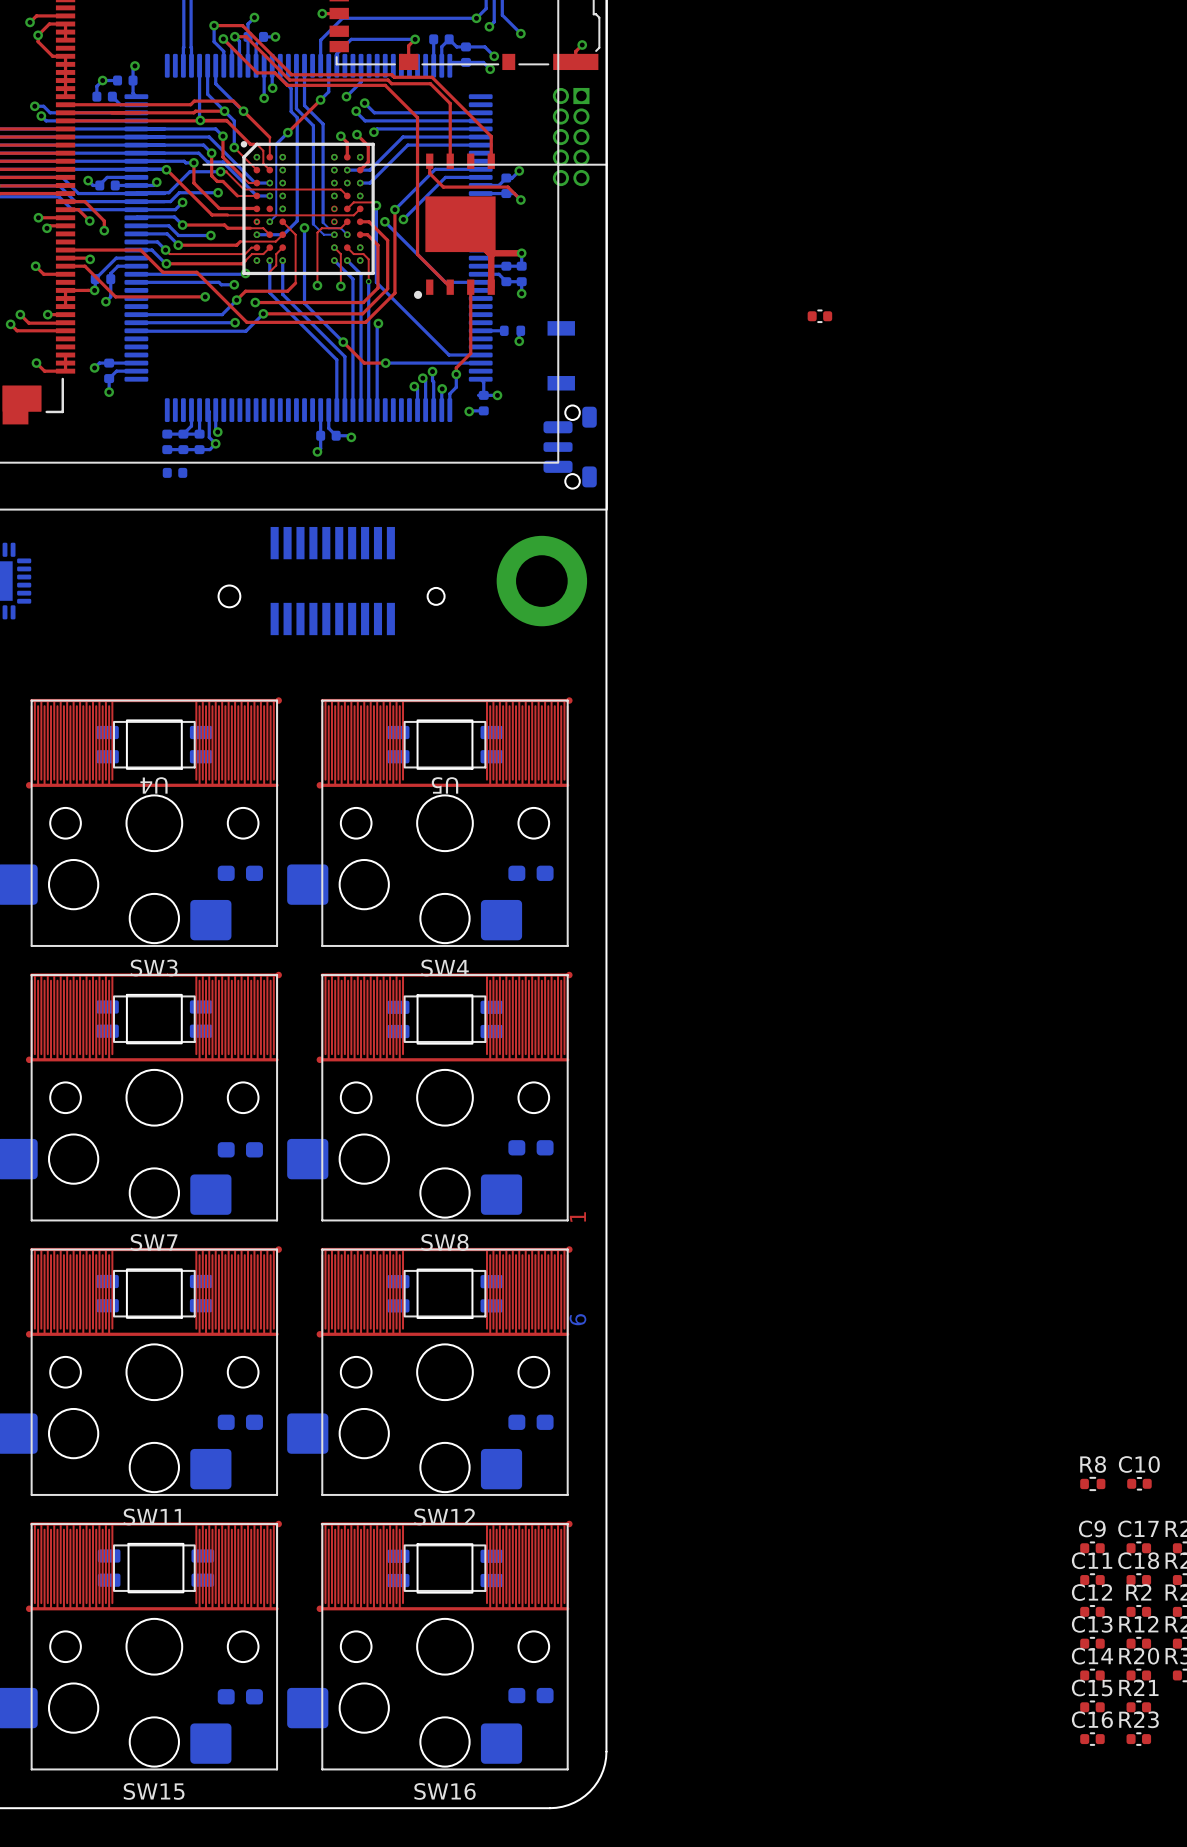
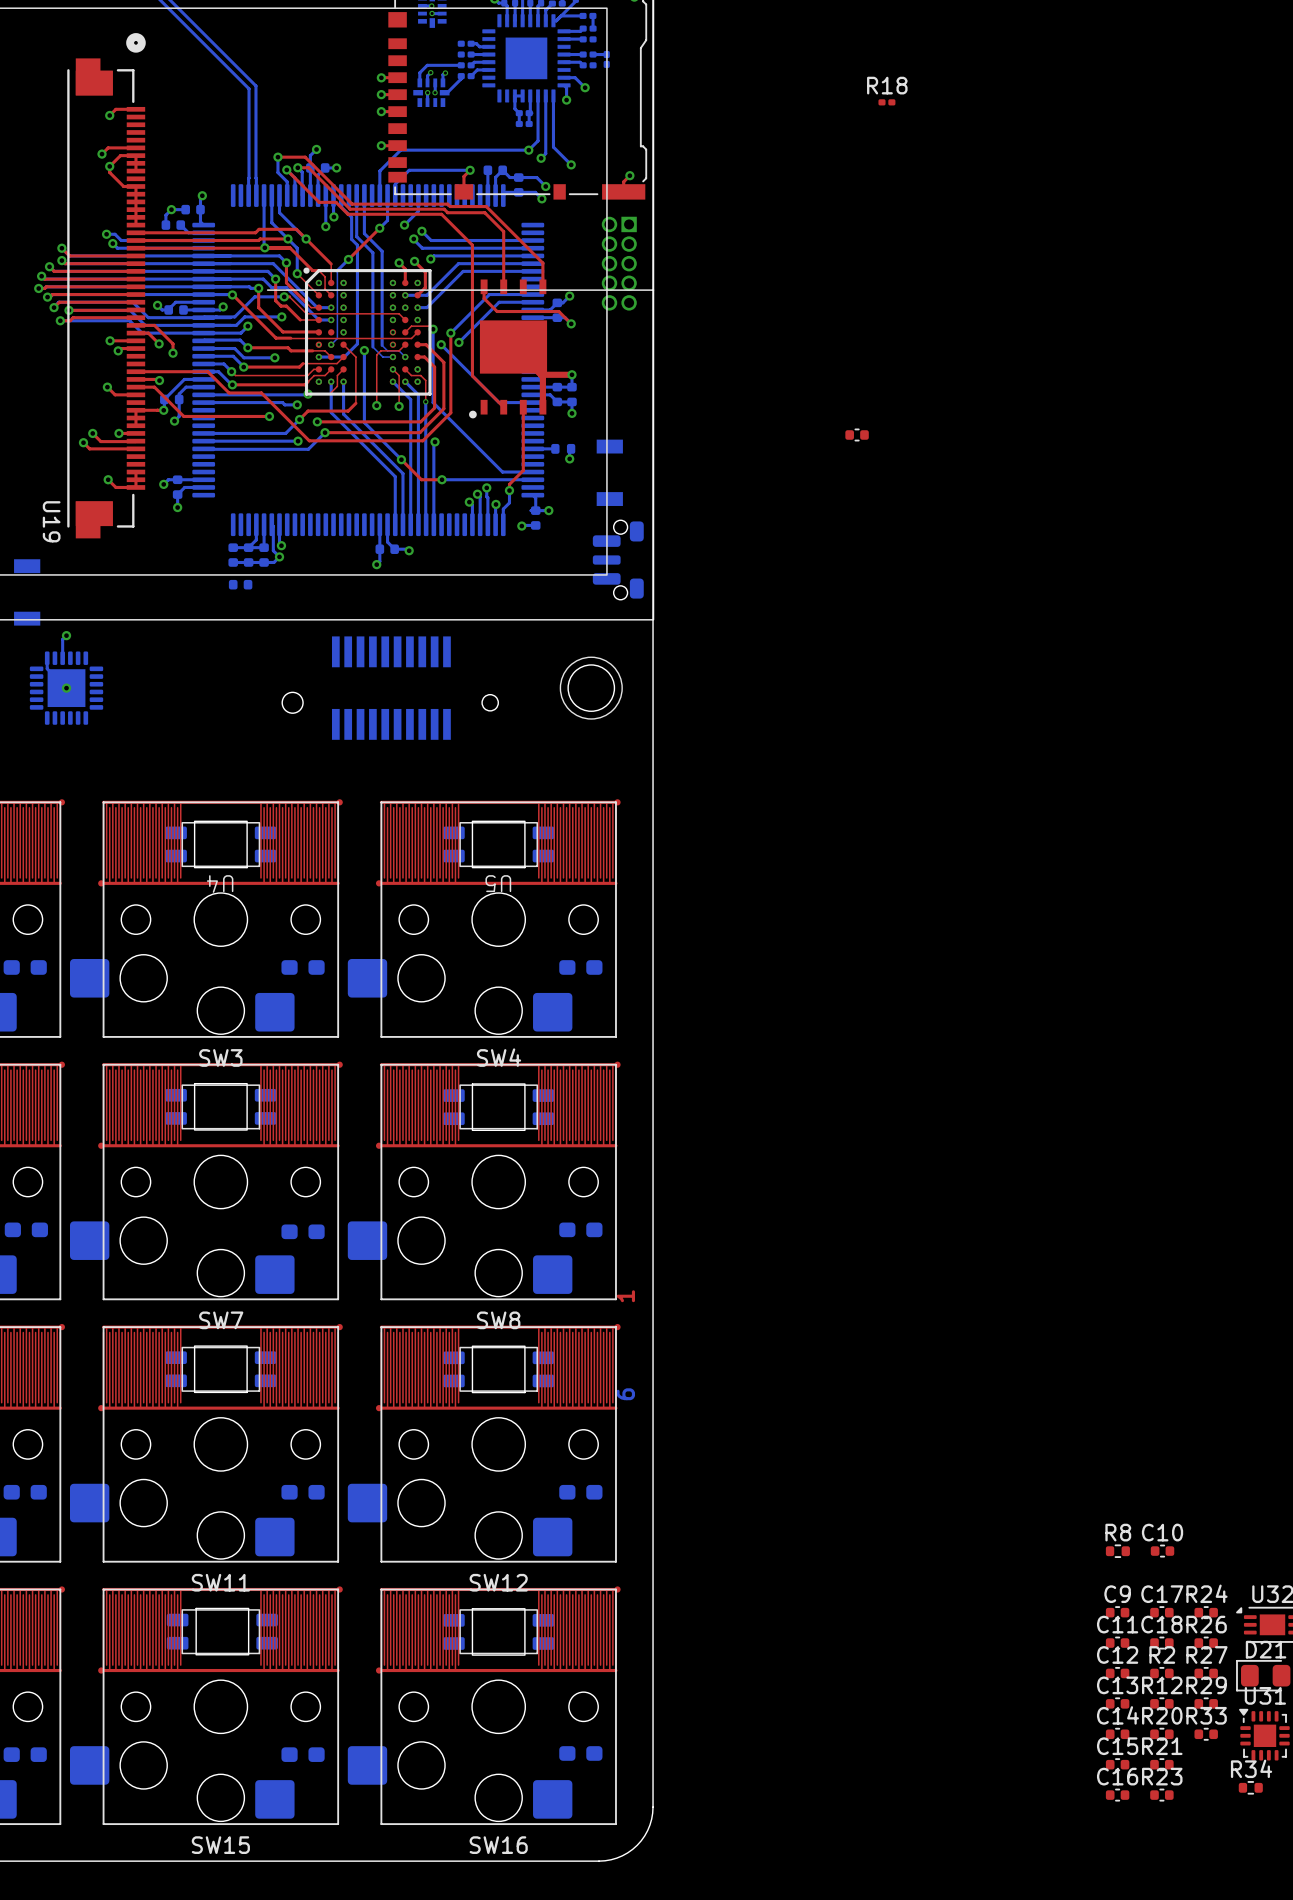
drawing: none -> [560, 656, 623, 720]
round board edge: none -> [567, 664, 615, 712]
part: (541, 581) -> none

